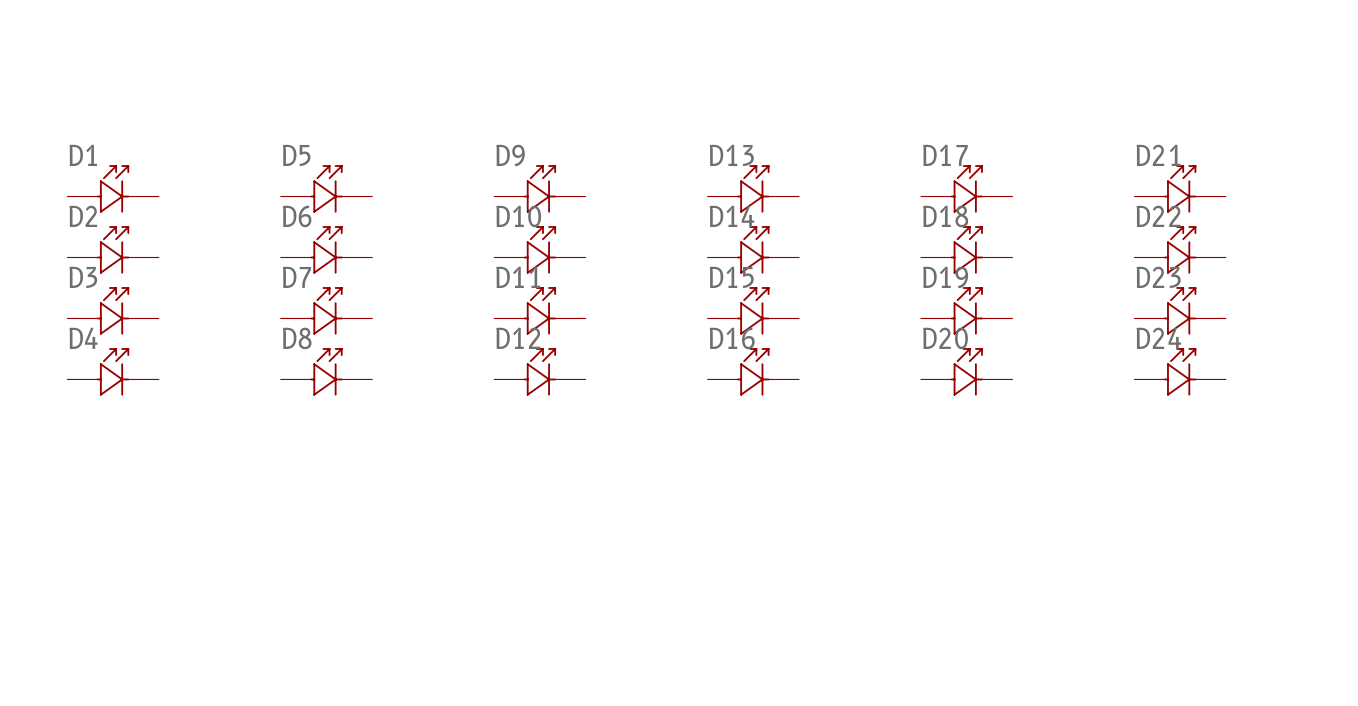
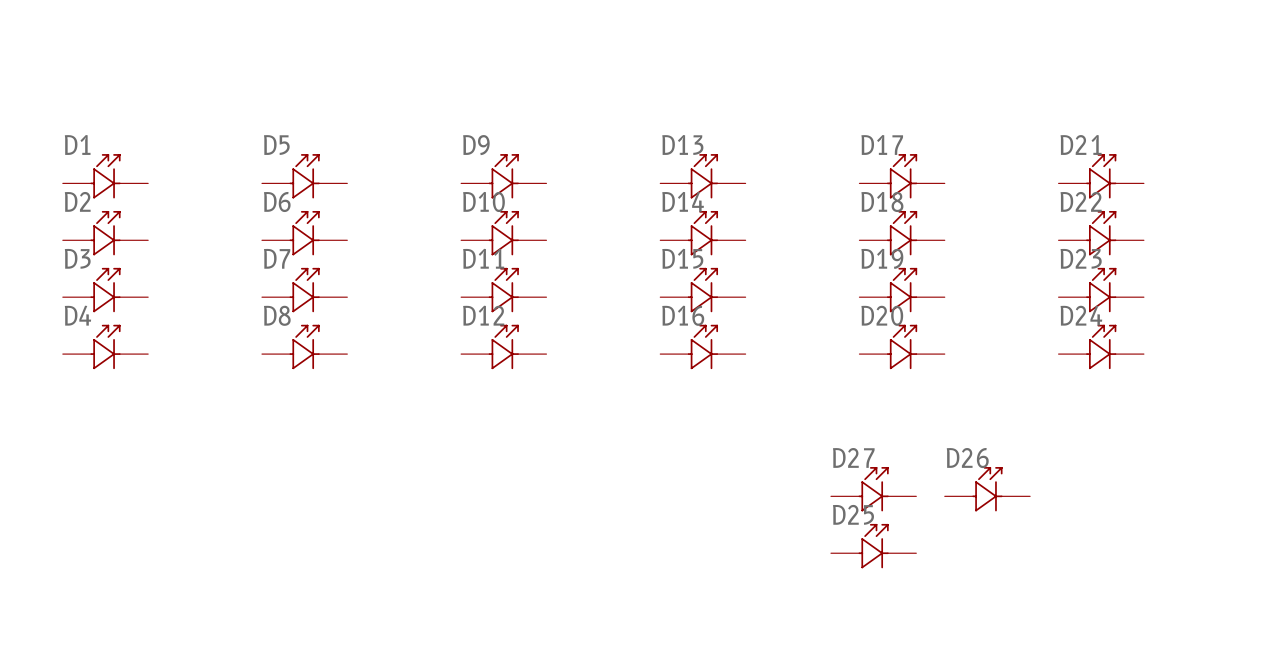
D27: none -> (873, 489)
D26: none -> (987, 489)
D25: none -> (873, 546)

